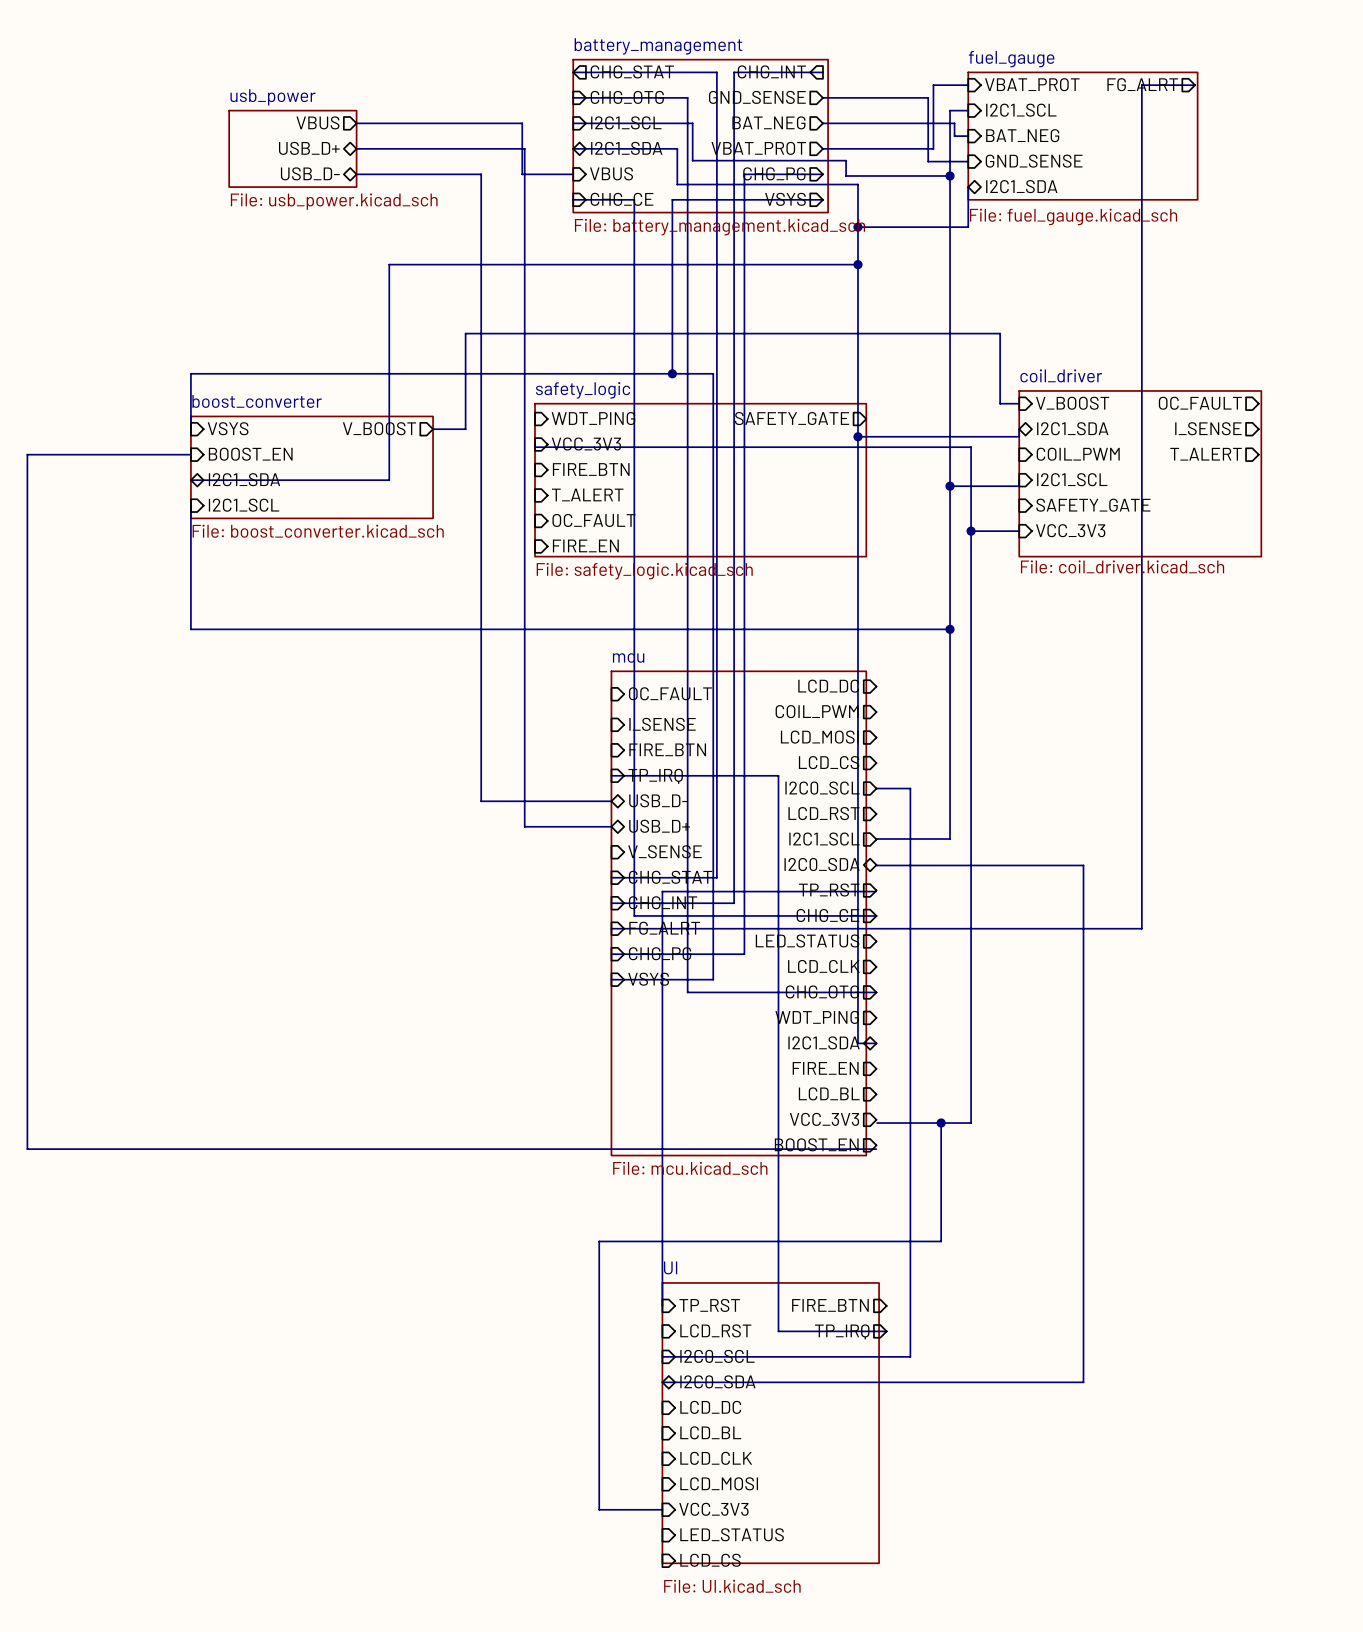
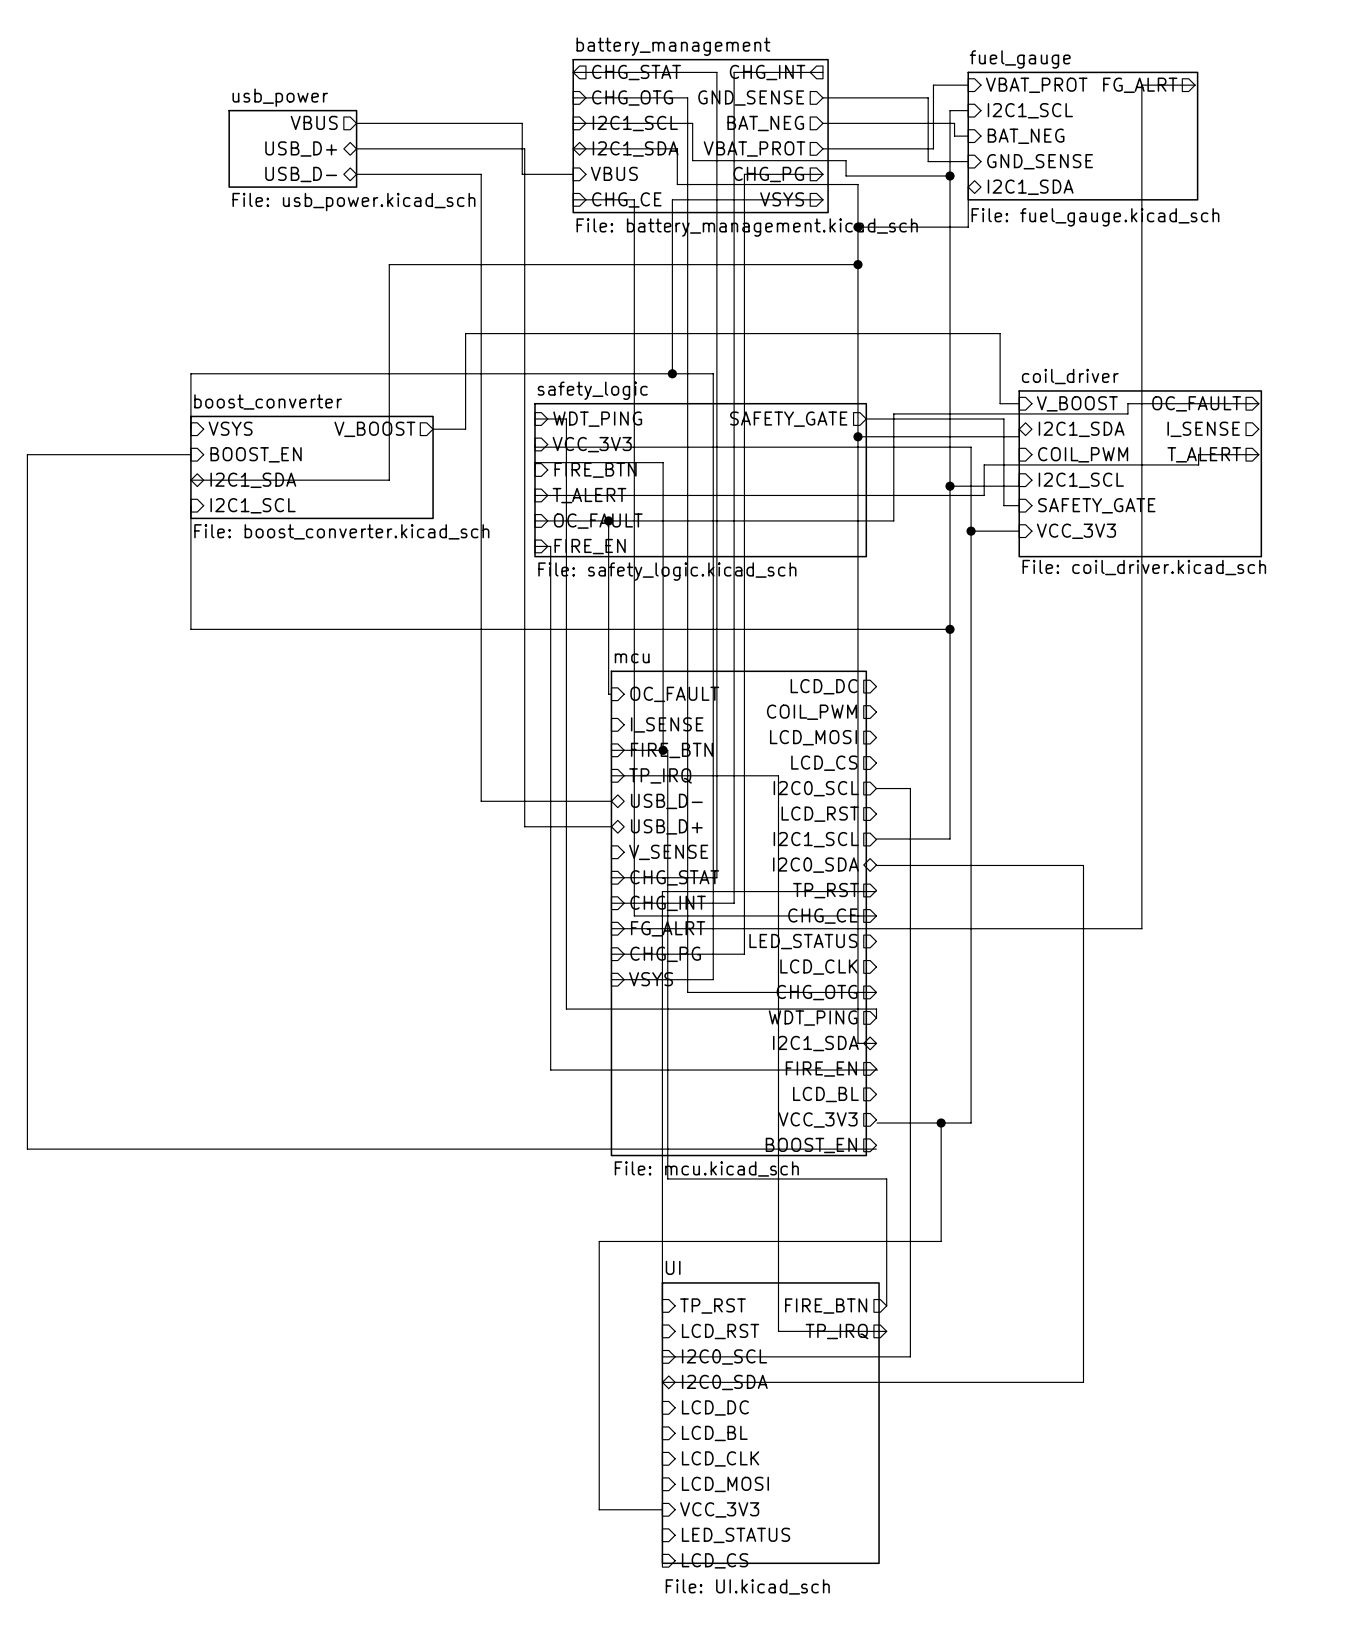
wire: none -> (1258, 403) (1127, 403) (1127, 413) (893, 413) (893, 520) (534, 520)
wire: none -> (534, 419) (566, 419) (566, 1009) (876, 1009) (876, 1017)
wire: none -> (866, 419) (1003, 419) (1003, 505) (1019, 505)
wire: none -> (1258, 454) (1198, 454) (1198, 464) (984, 464) (984, 495) (534, 495)
wire: none -> (534, 469) (534, 462) (663, 462) (663, 750)
wire: none -> (608, 520) (608, 694) (611, 694)
junction: none -> (608, 520)
wire: none -> (534, 546) (550, 546) (550, 1070) (877, 1070)
wire: none -> (611, 750) (667, 750) (667, 1178) (886, 1178) (886, 1305)
junction: none -> (663, 750)

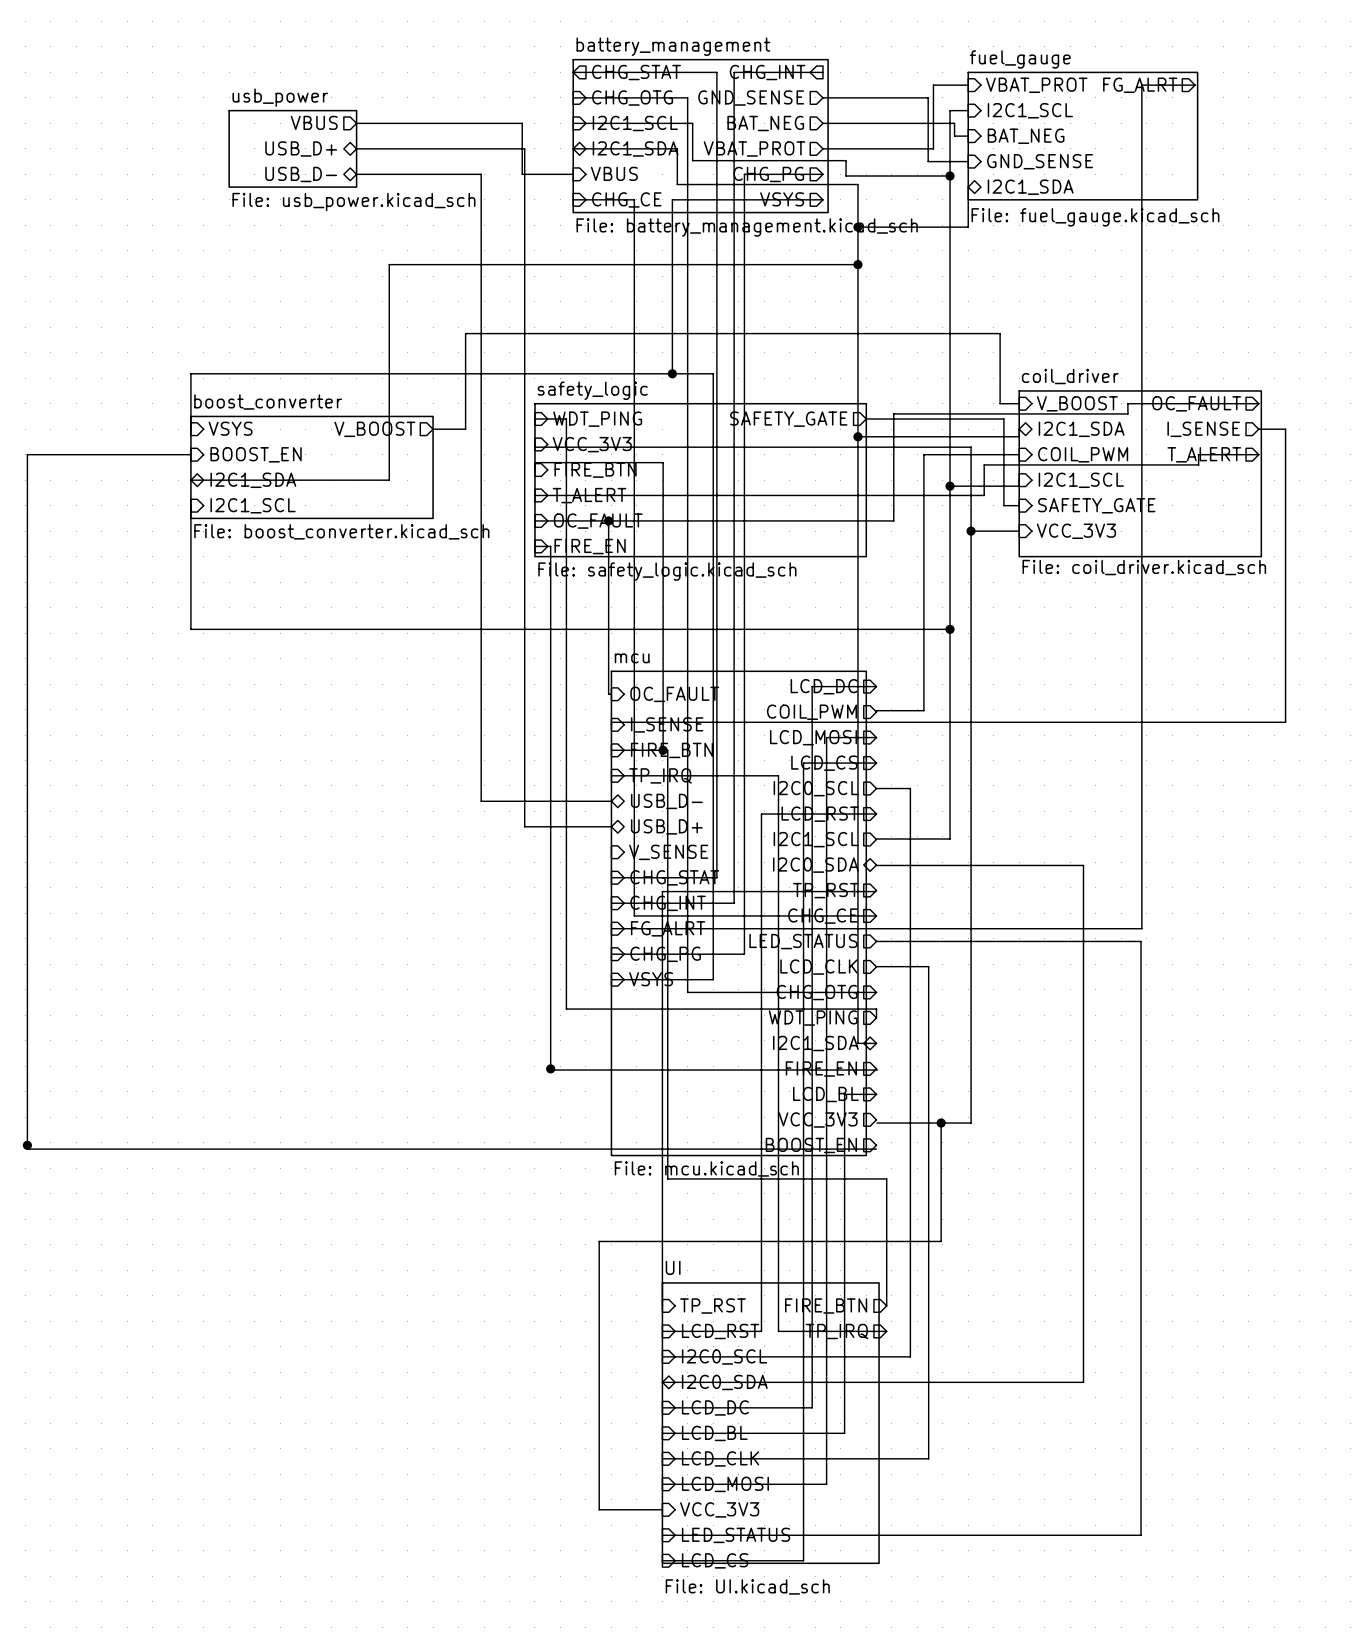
wire: none -> (1258, 429) (1285, 429) (1285, 722) (611, 722) (611, 724)
wire: none -> (1019, 454) (923, 454) (923, 710) (876, 712)
wire: none -> (876, 686) (812, 686) (812, 1407) (662, 1407)
wire: none -> (876, 737) (826, 737) (826, 1484) (662, 1484)
wire: none -> (876, 763) (803, 763) (803, 1560) (662, 1560)
wire: none -> (876, 814) (761, 814) (761, 1331) (662, 1331)
wire: none -> (876, 941) (1141, 941) (1141, 1535) (662, 1535)
wire: none -> (876, 966) (928, 966) (928, 1458) (662, 1458)
junction: none -> (550, 1068)
wire: none -> (876, 1094) (844, 1094) (844, 1433) (662, 1433)
junction: none -> (27, 1145)

